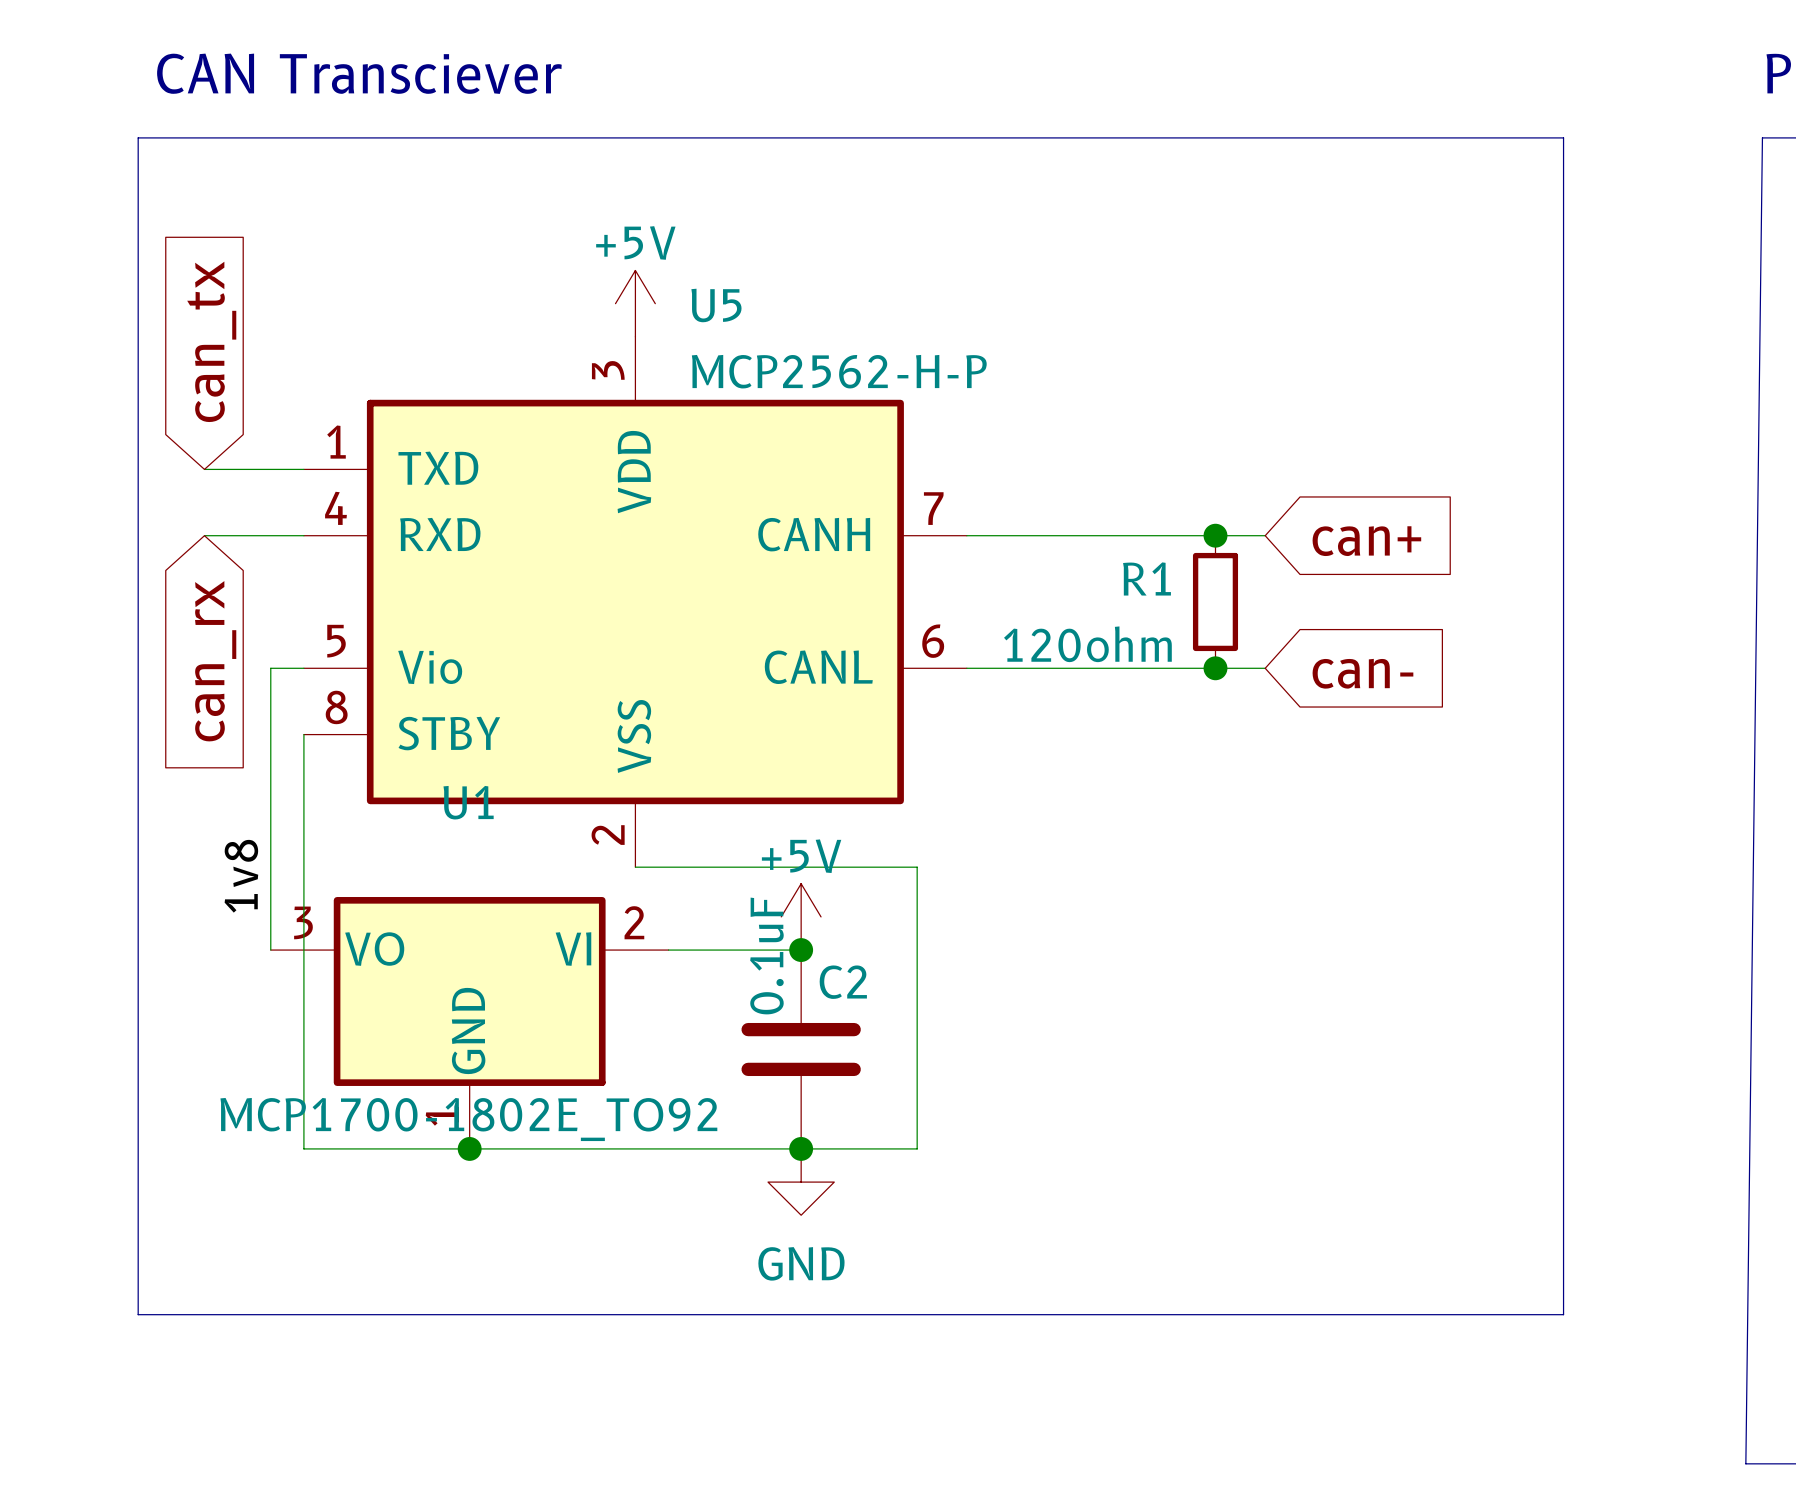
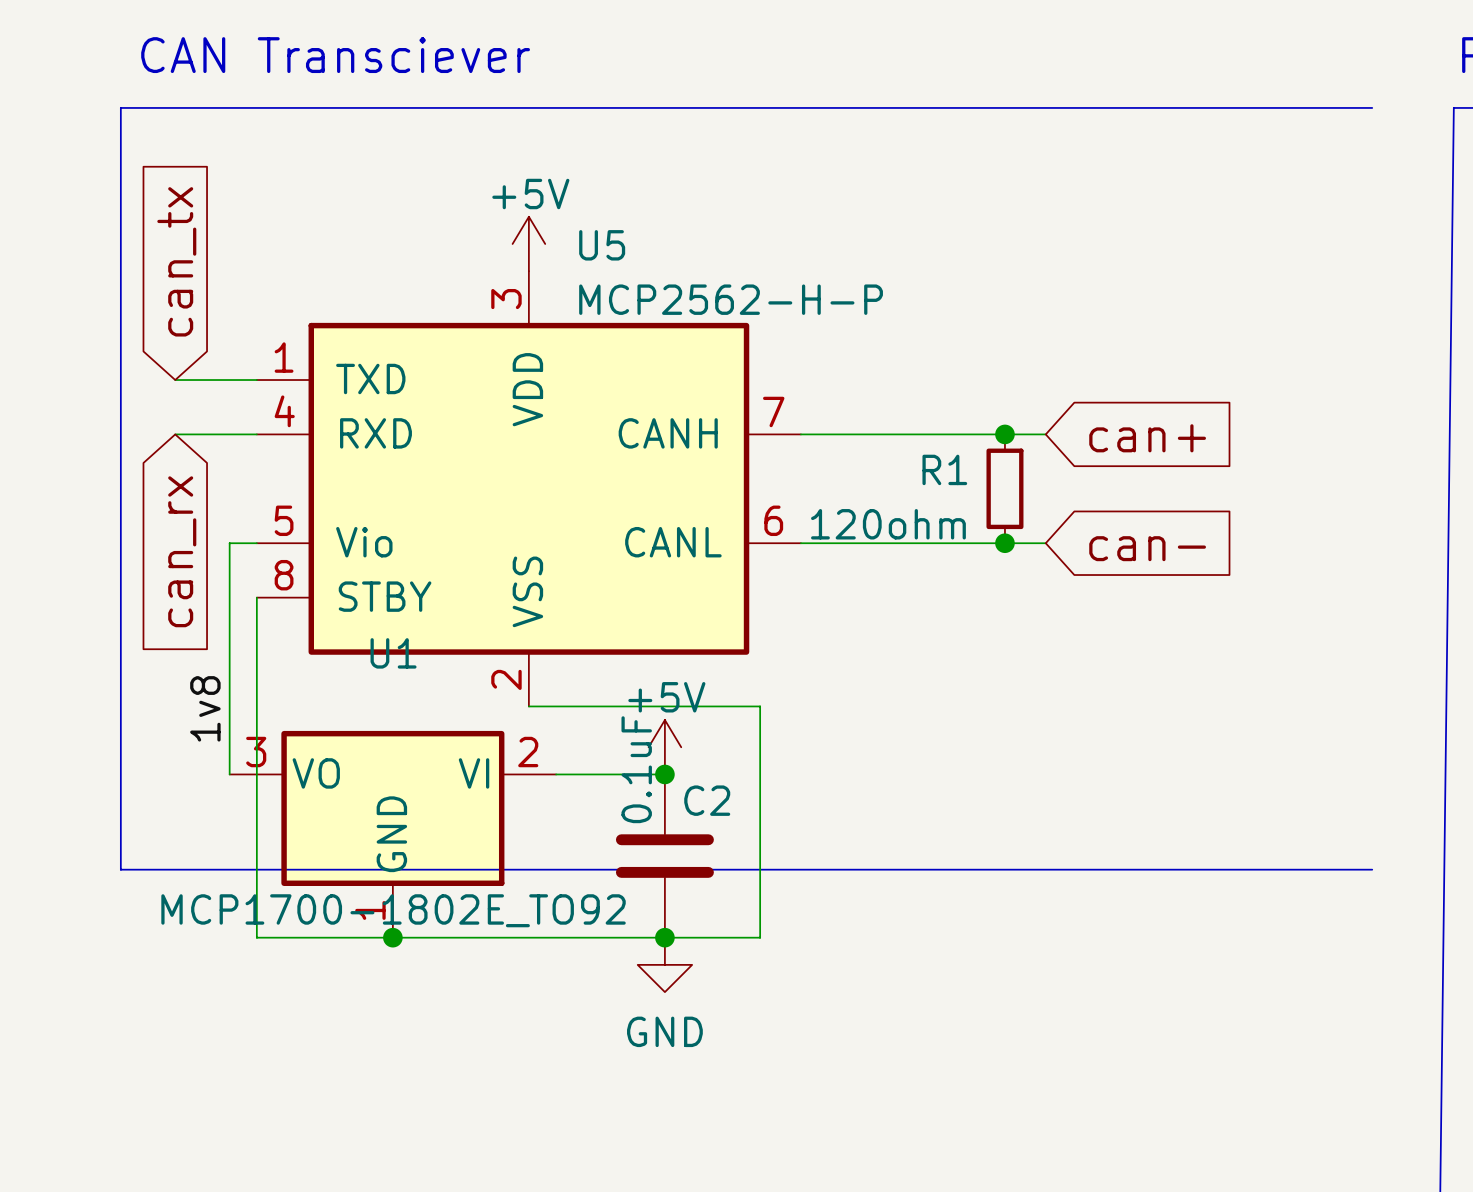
line: (1563, 137) (1563, 1314) (138, 1314) (138, 1066) -> (1372, 869) (120, 869)
line: none -> (1290, 107) (1372, 107)

